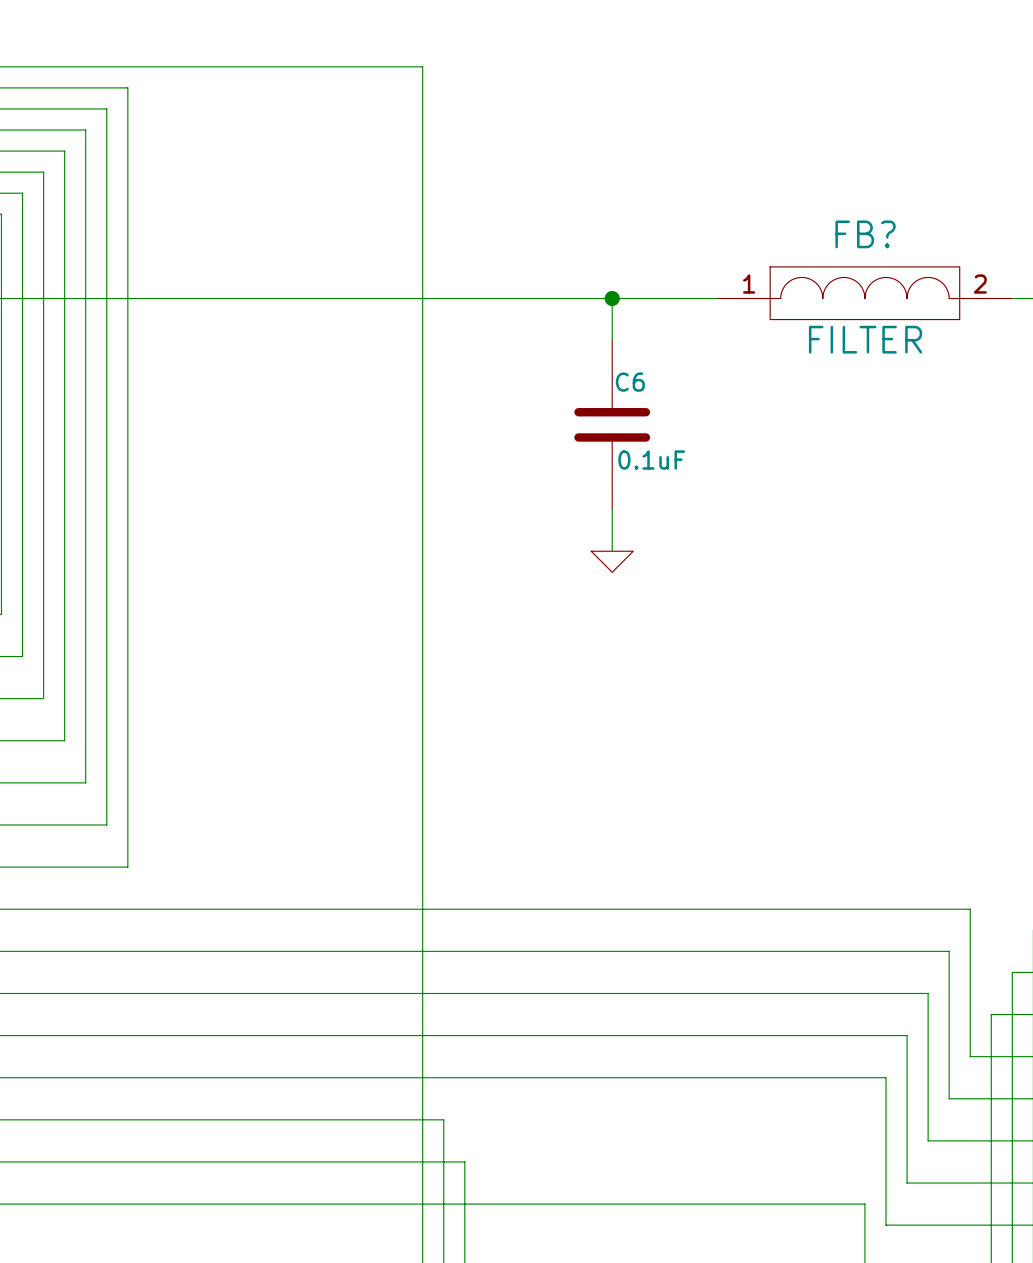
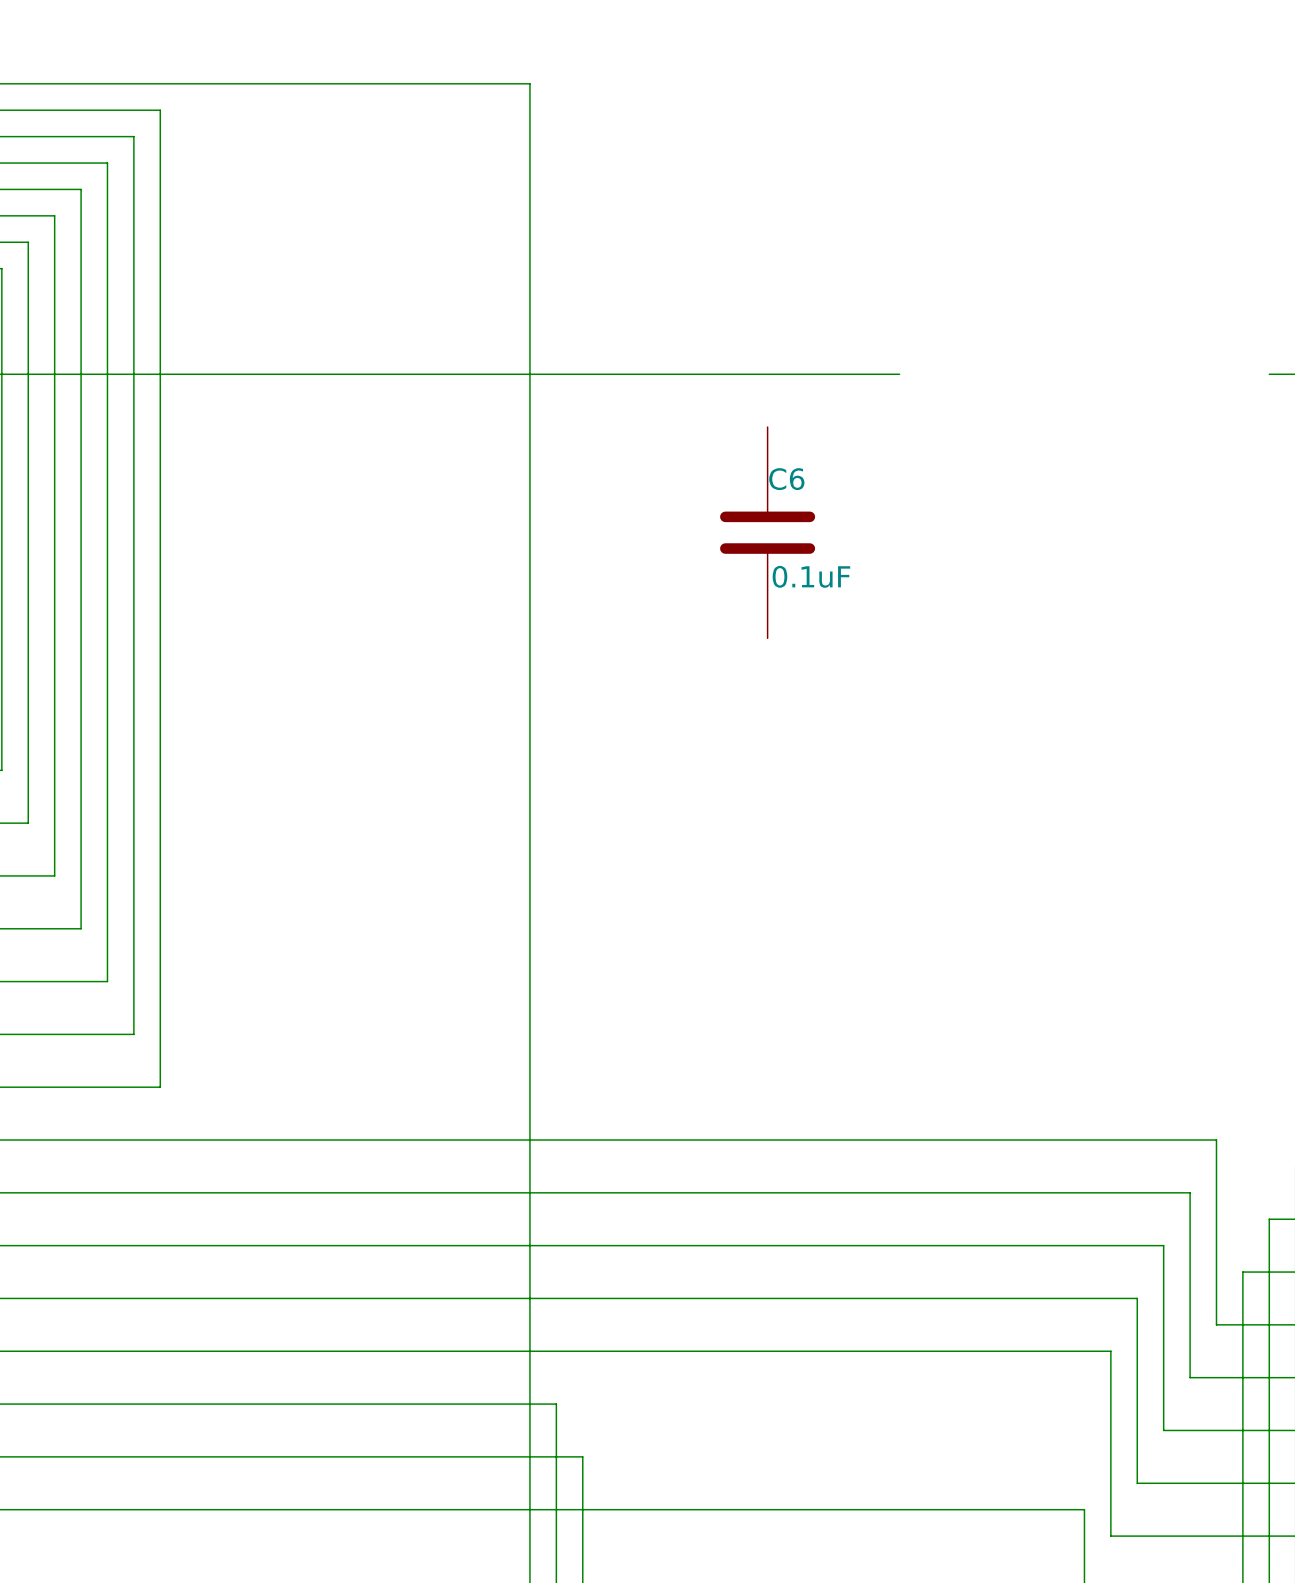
FB?: FILTER (864, 293) -> none
wire: (612, 298) (612, 340) -> none
junction: (612, 298) -> none
wire: (612, 509) (612, 551) -> none
power symbol: (612, 561) -> none

